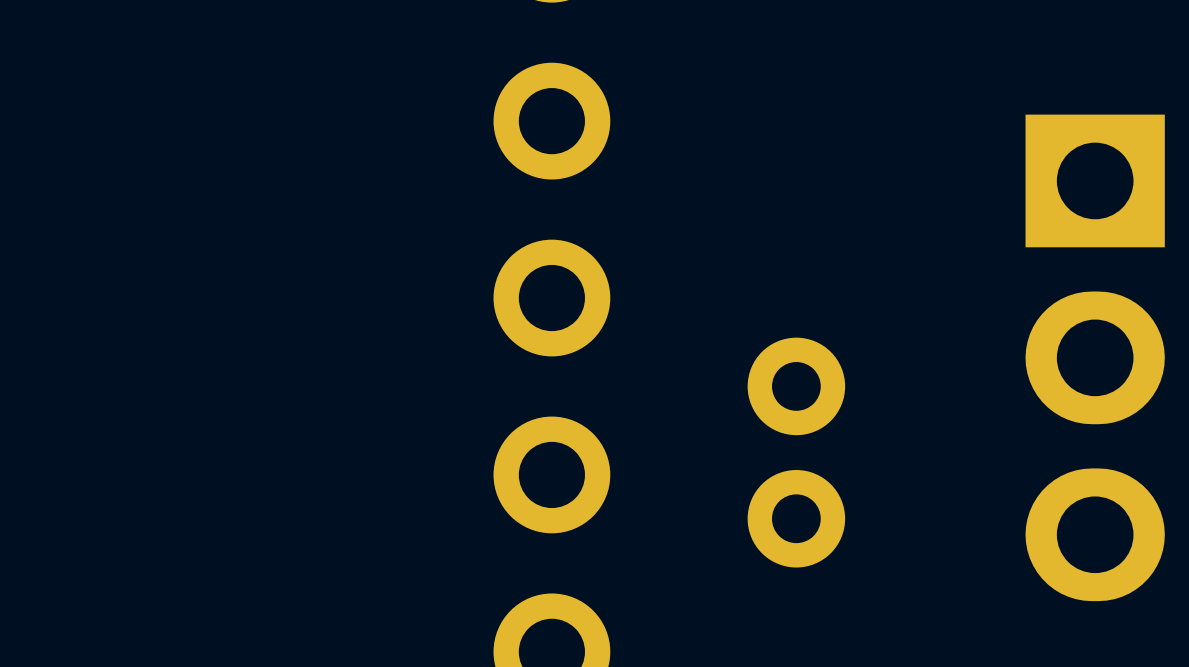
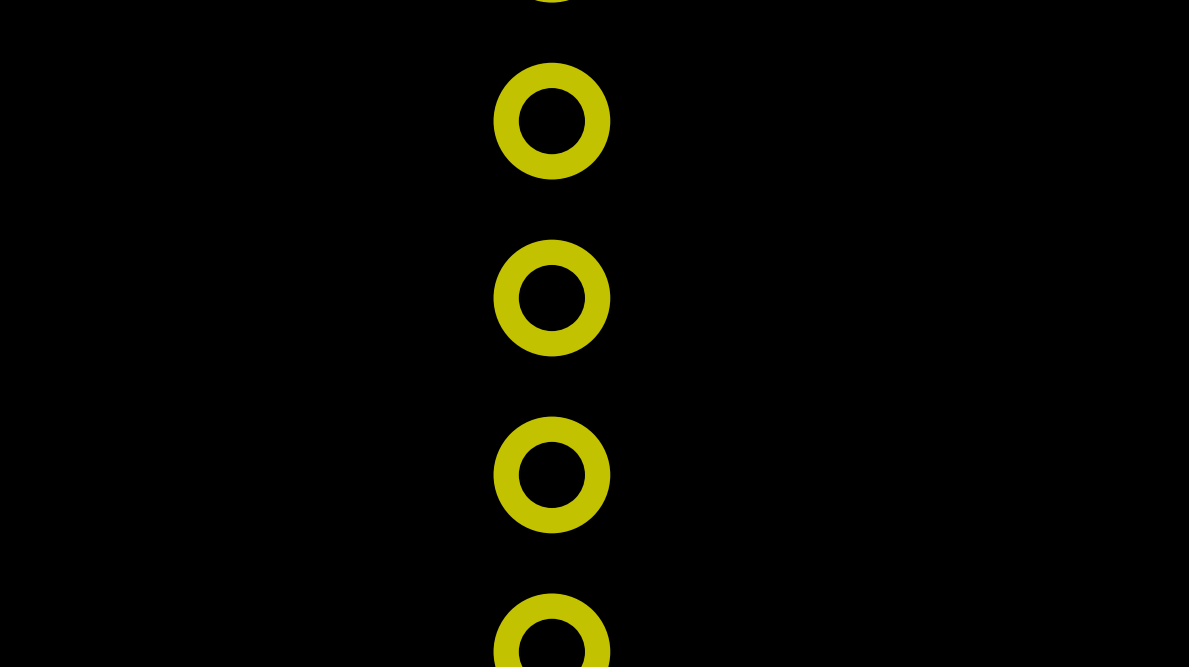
part: (1095, 357) -> none
part: (796, 452) -> none

